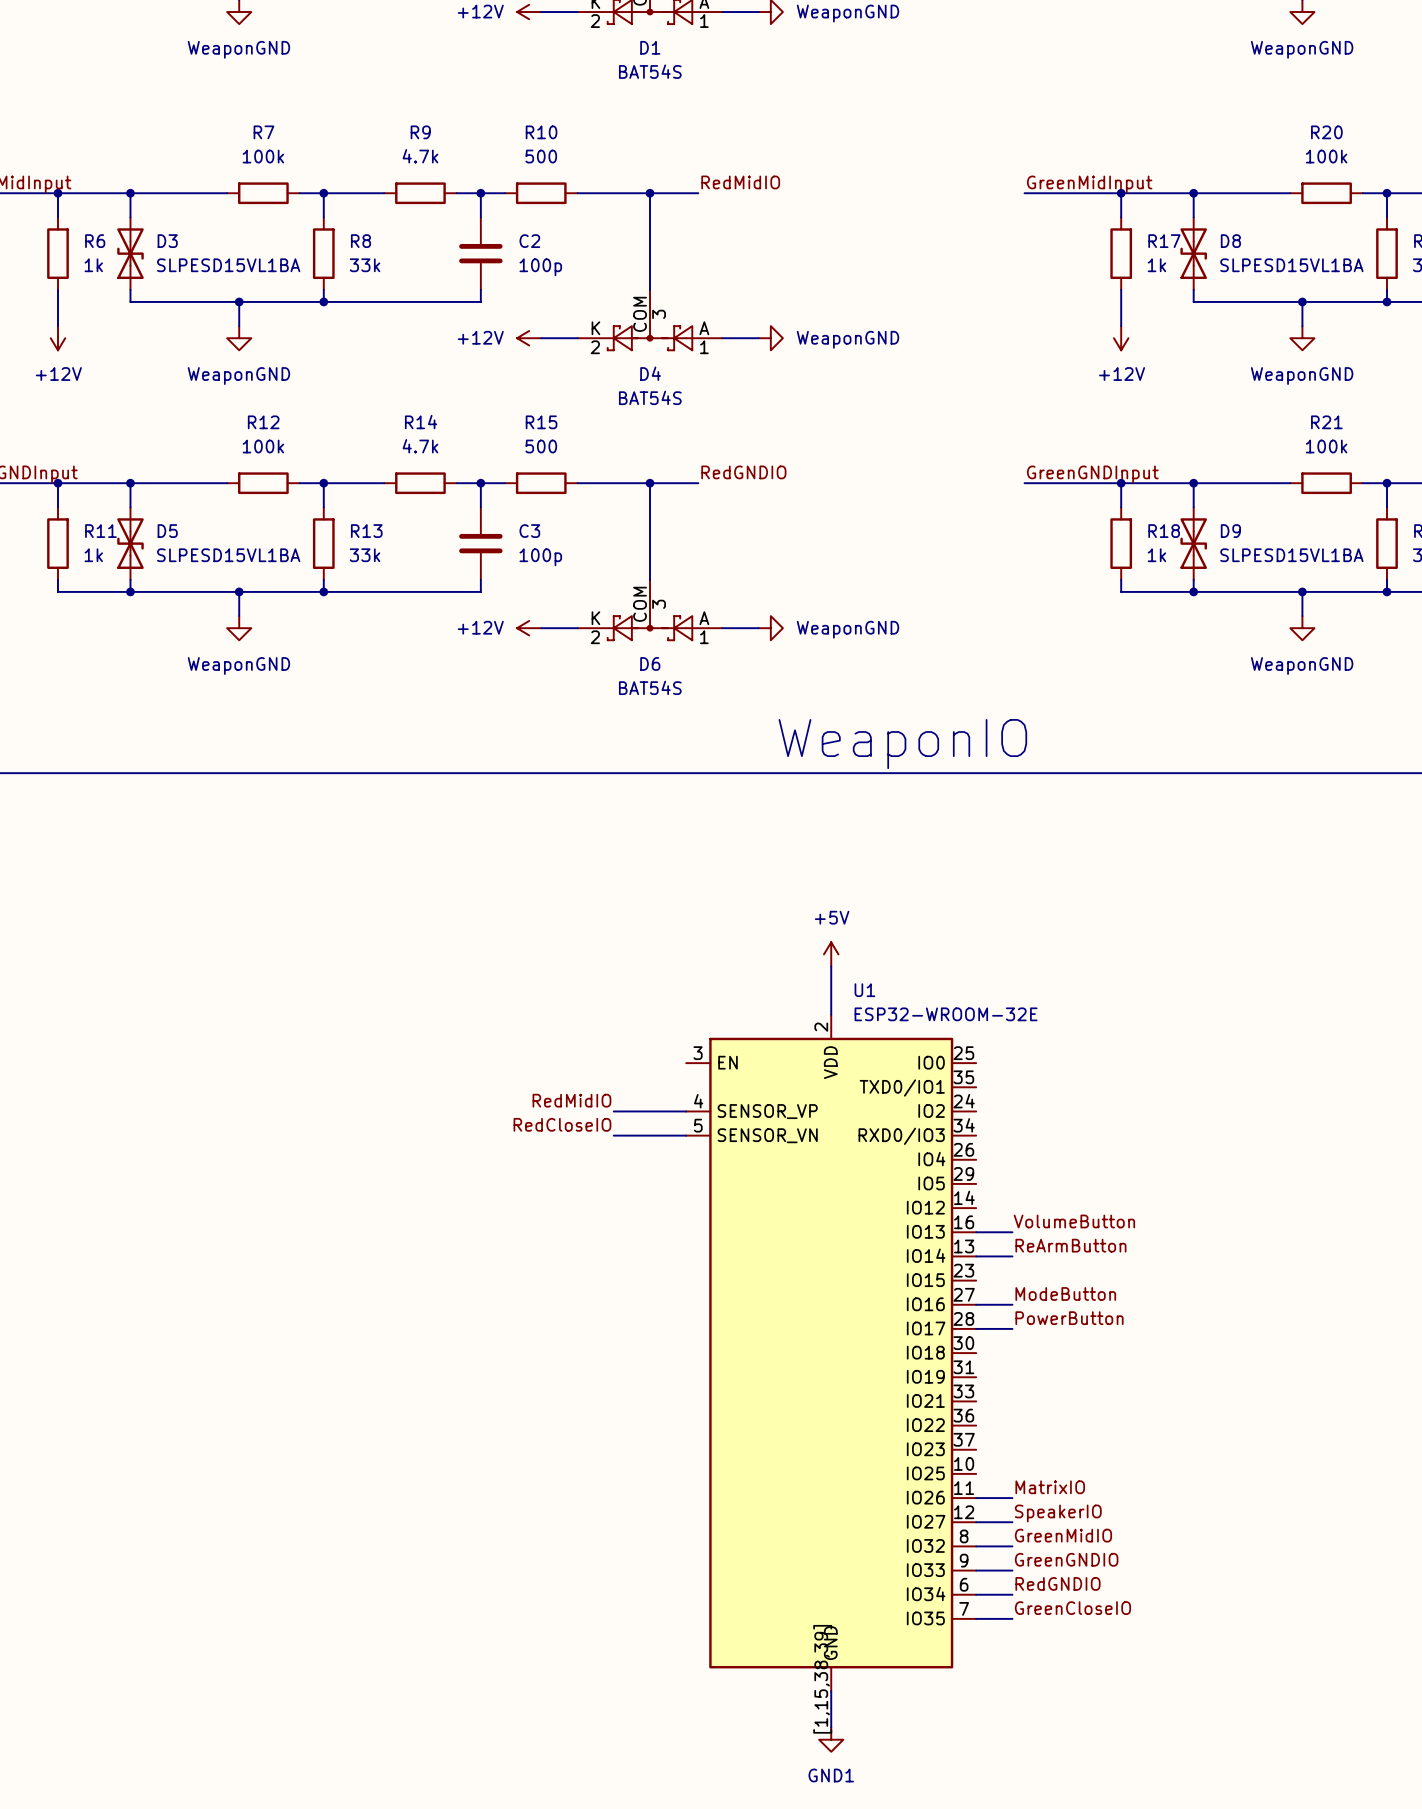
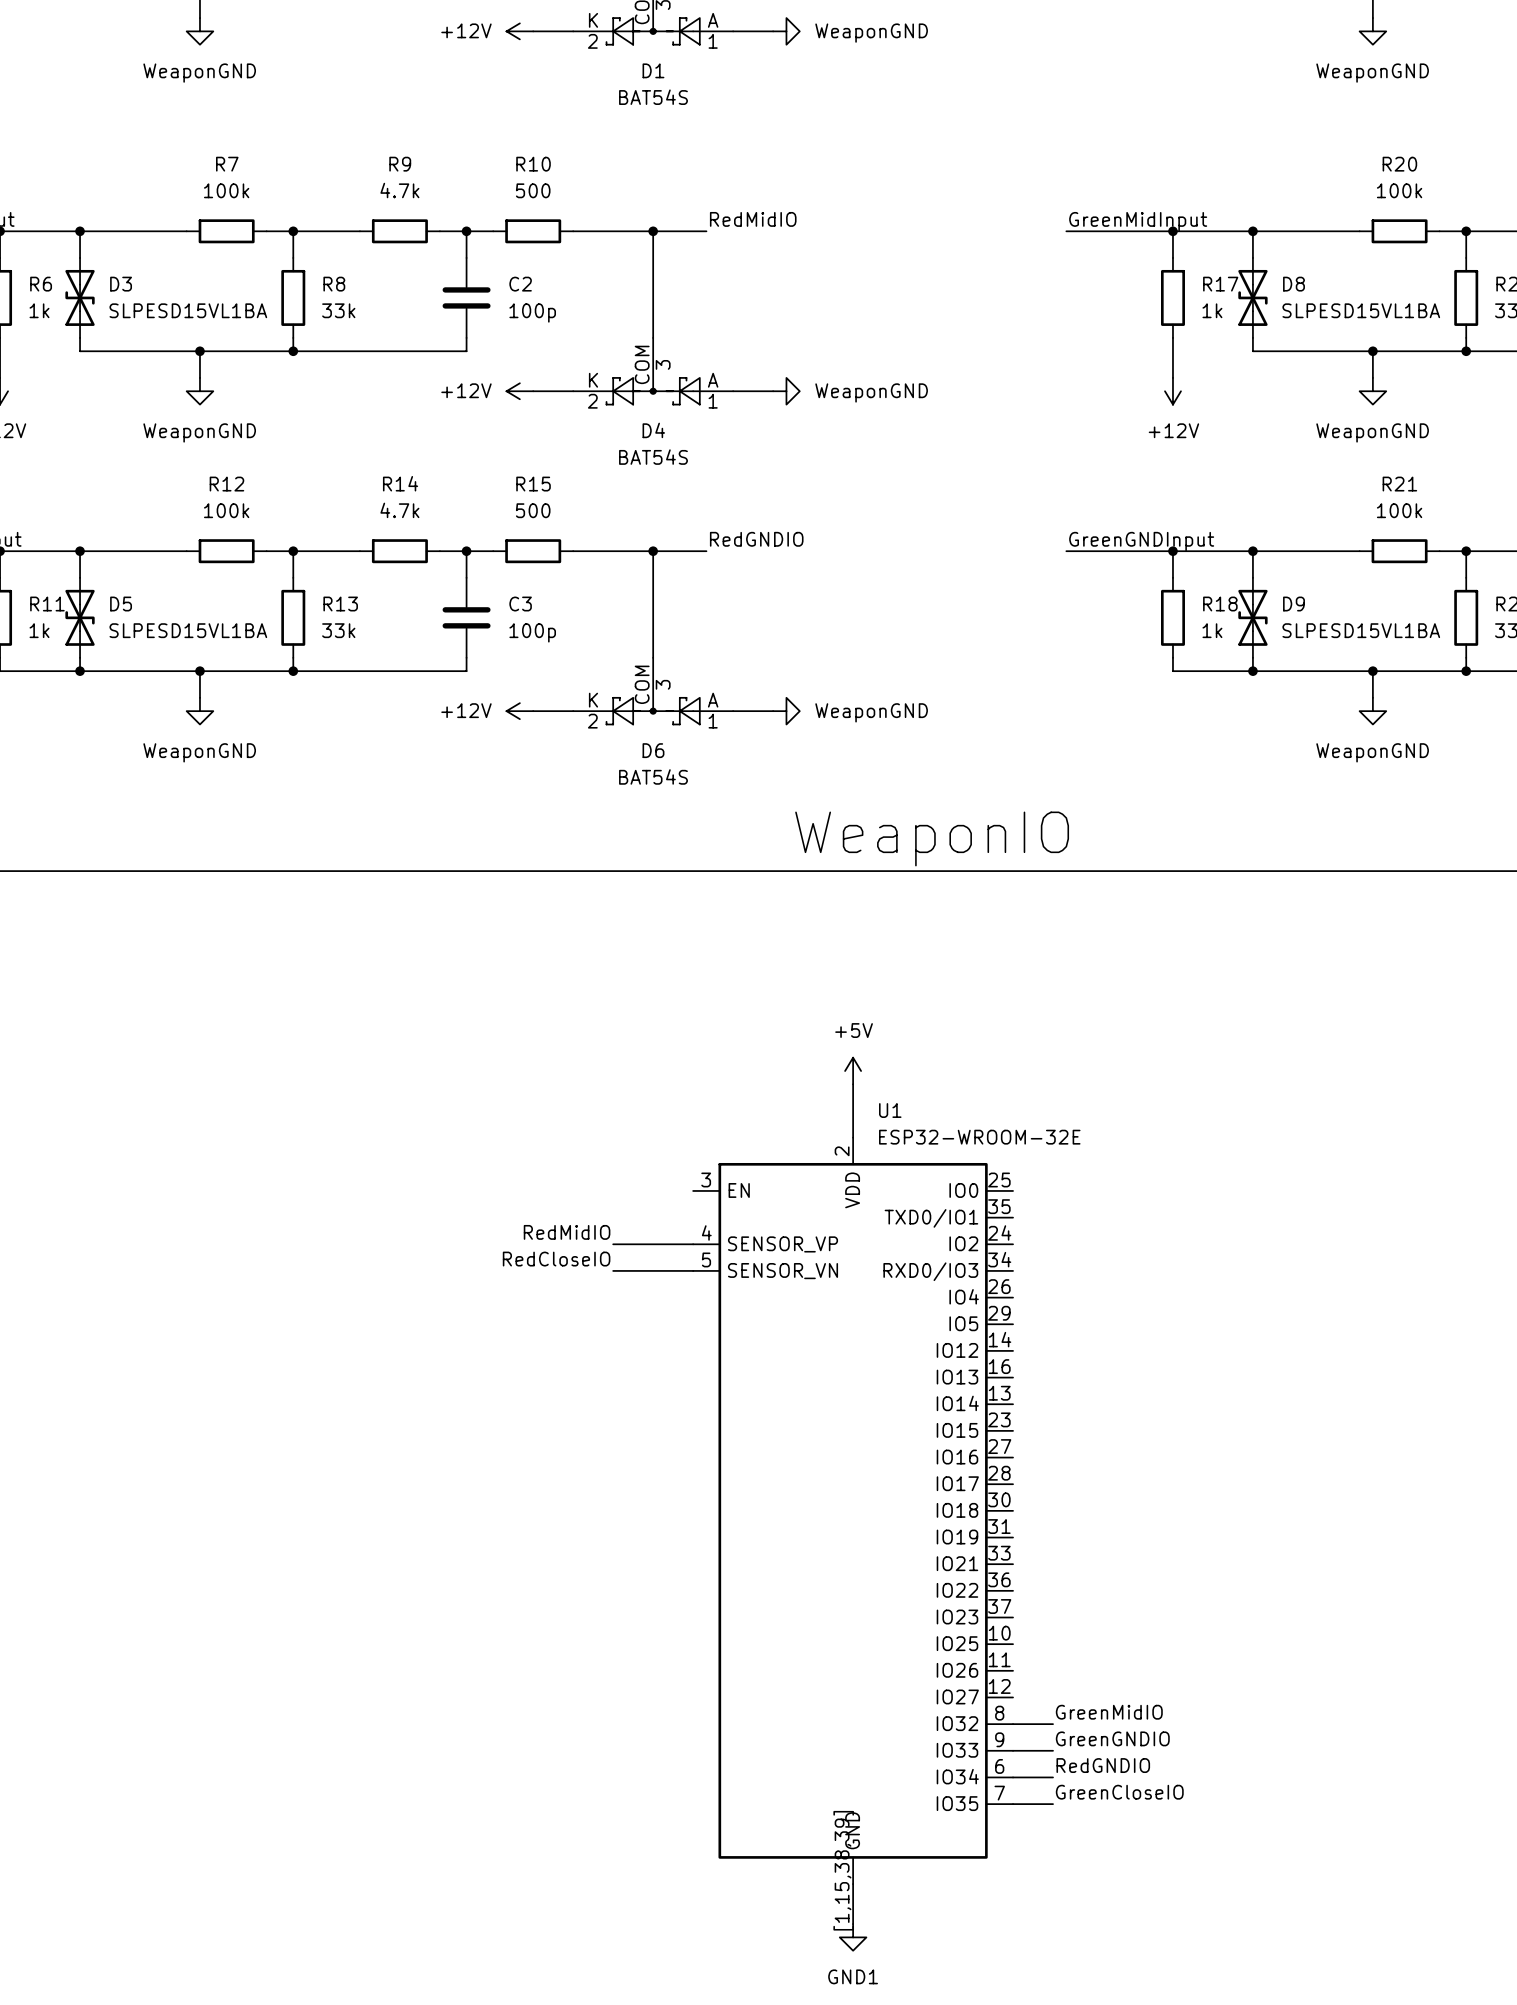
label: VolumeButton (1074, 1221) -> none
wire: (976, 1232) (1012, 1232) -> none
label: ReArmButton (1070, 1245) -> none
wire: (976, 1256) (1012, 1256) -> none
label: ModeButton (1065, 1293) -> none
wire: (976, 1304) (1012, 1304) -> none
label: PowerButton (1069, 1318) -> none
wire: (976, 1328) (1012, 1328) -> none
label: MatrixIO (1050, 1487) -> none
wire: (976, 1498) (1012, 1498) -> none
label: SpeakerIO (1058, 1513) -> none
wire: (976, 1522) (1012, 1522) -> none

